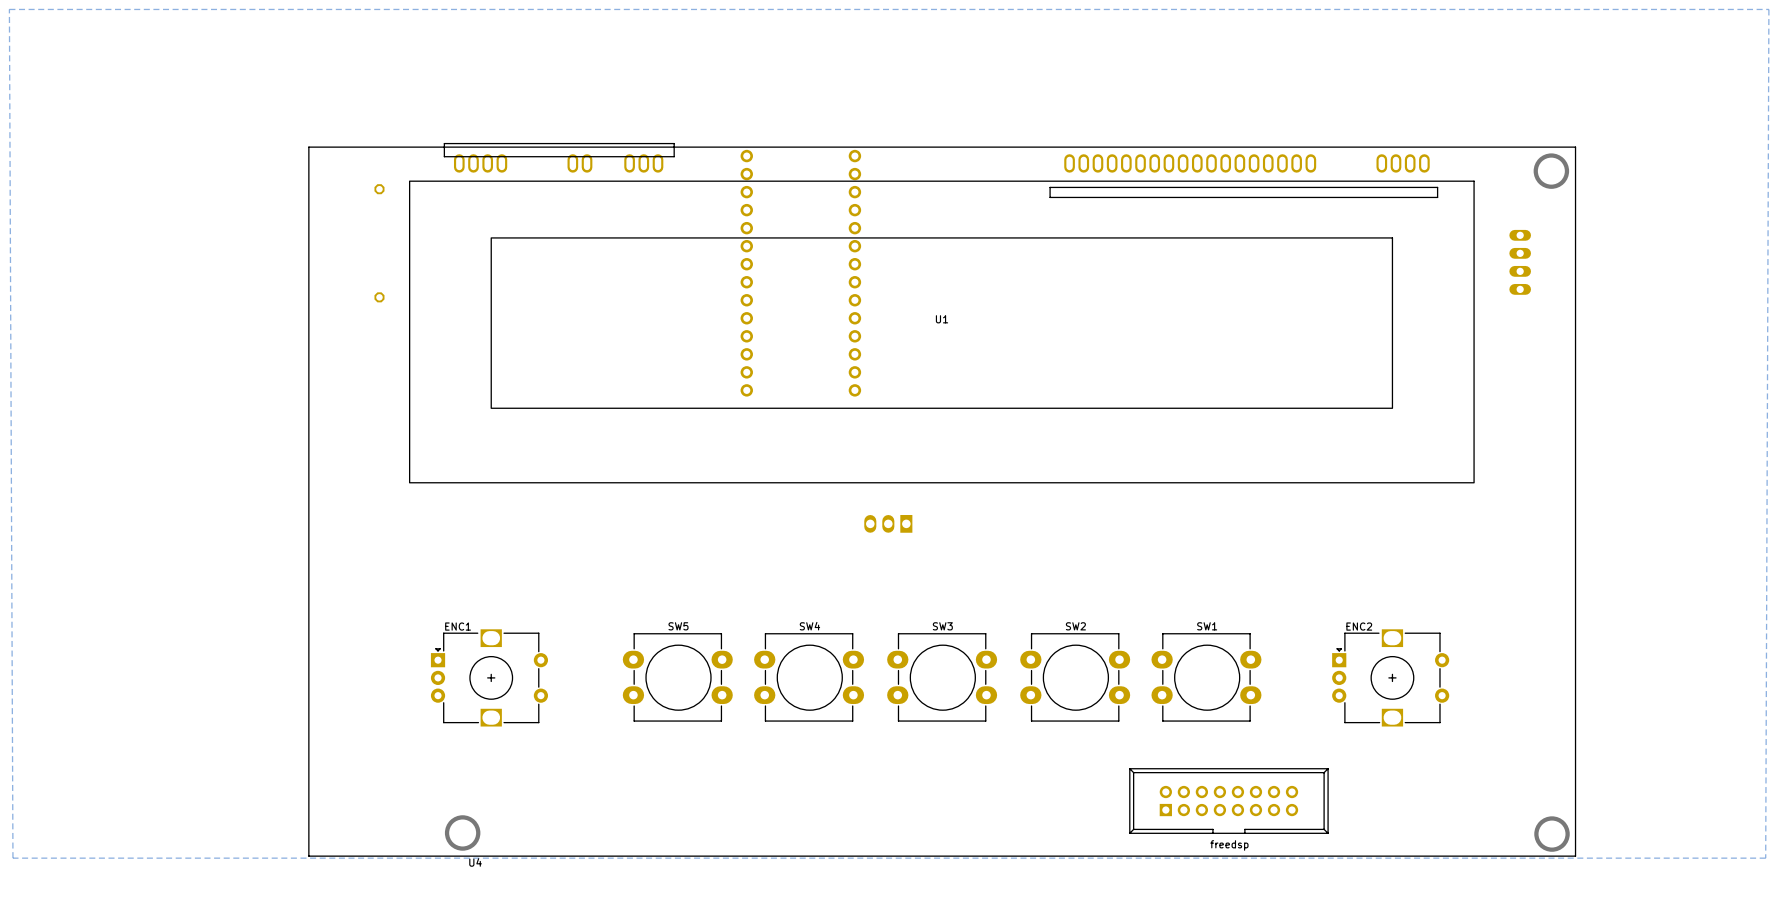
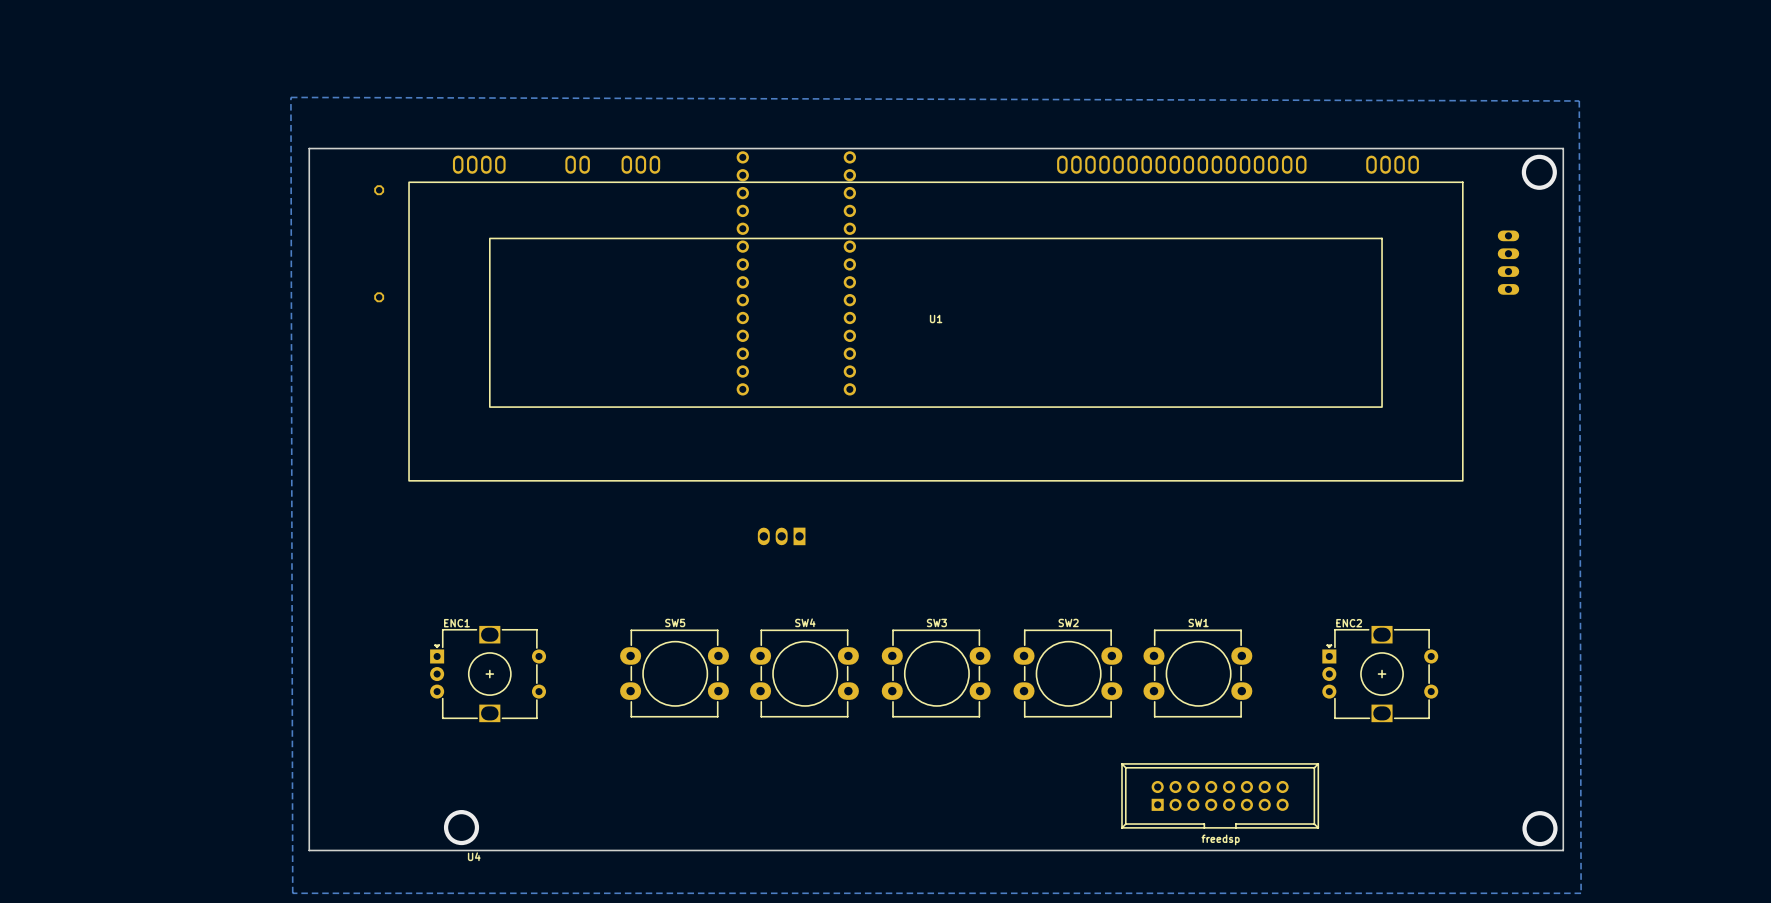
zone outline: (1768, 9) (9, 9) (12, 858) (1765, 858) (1768, 9) -> (290, 97) (1579, 101) (1581, 893) (292, 893) (290, 97)
board edge: (674, 143) (444, 143) (444, 156) (674, 156) (674, 143) -> none
board edge: (1437, 187) (1050, 187) (1050, 197) (1437, 197) (1437, 187) -> none
part position: (888, 523) -> (781, 536)

